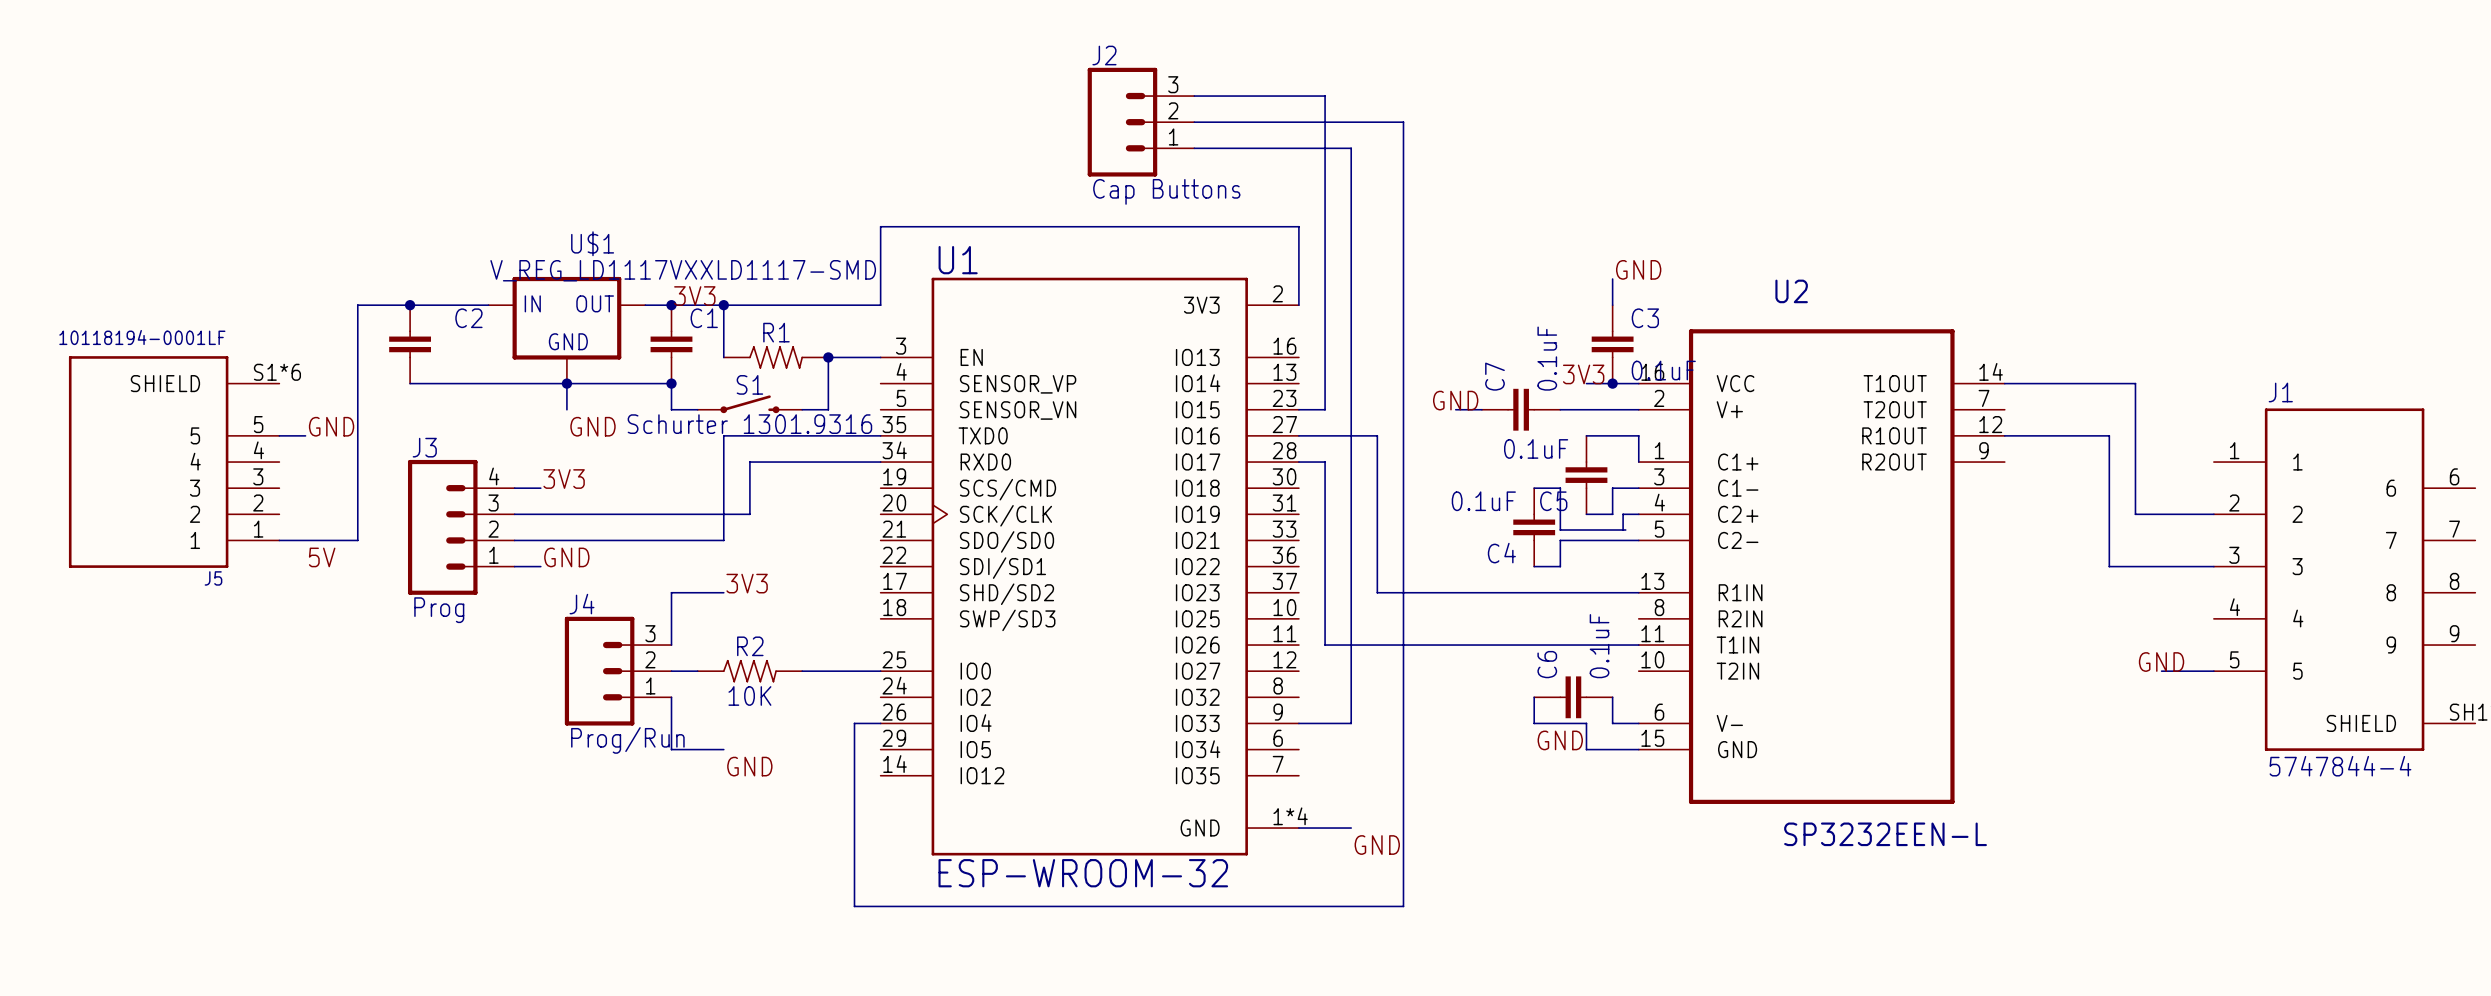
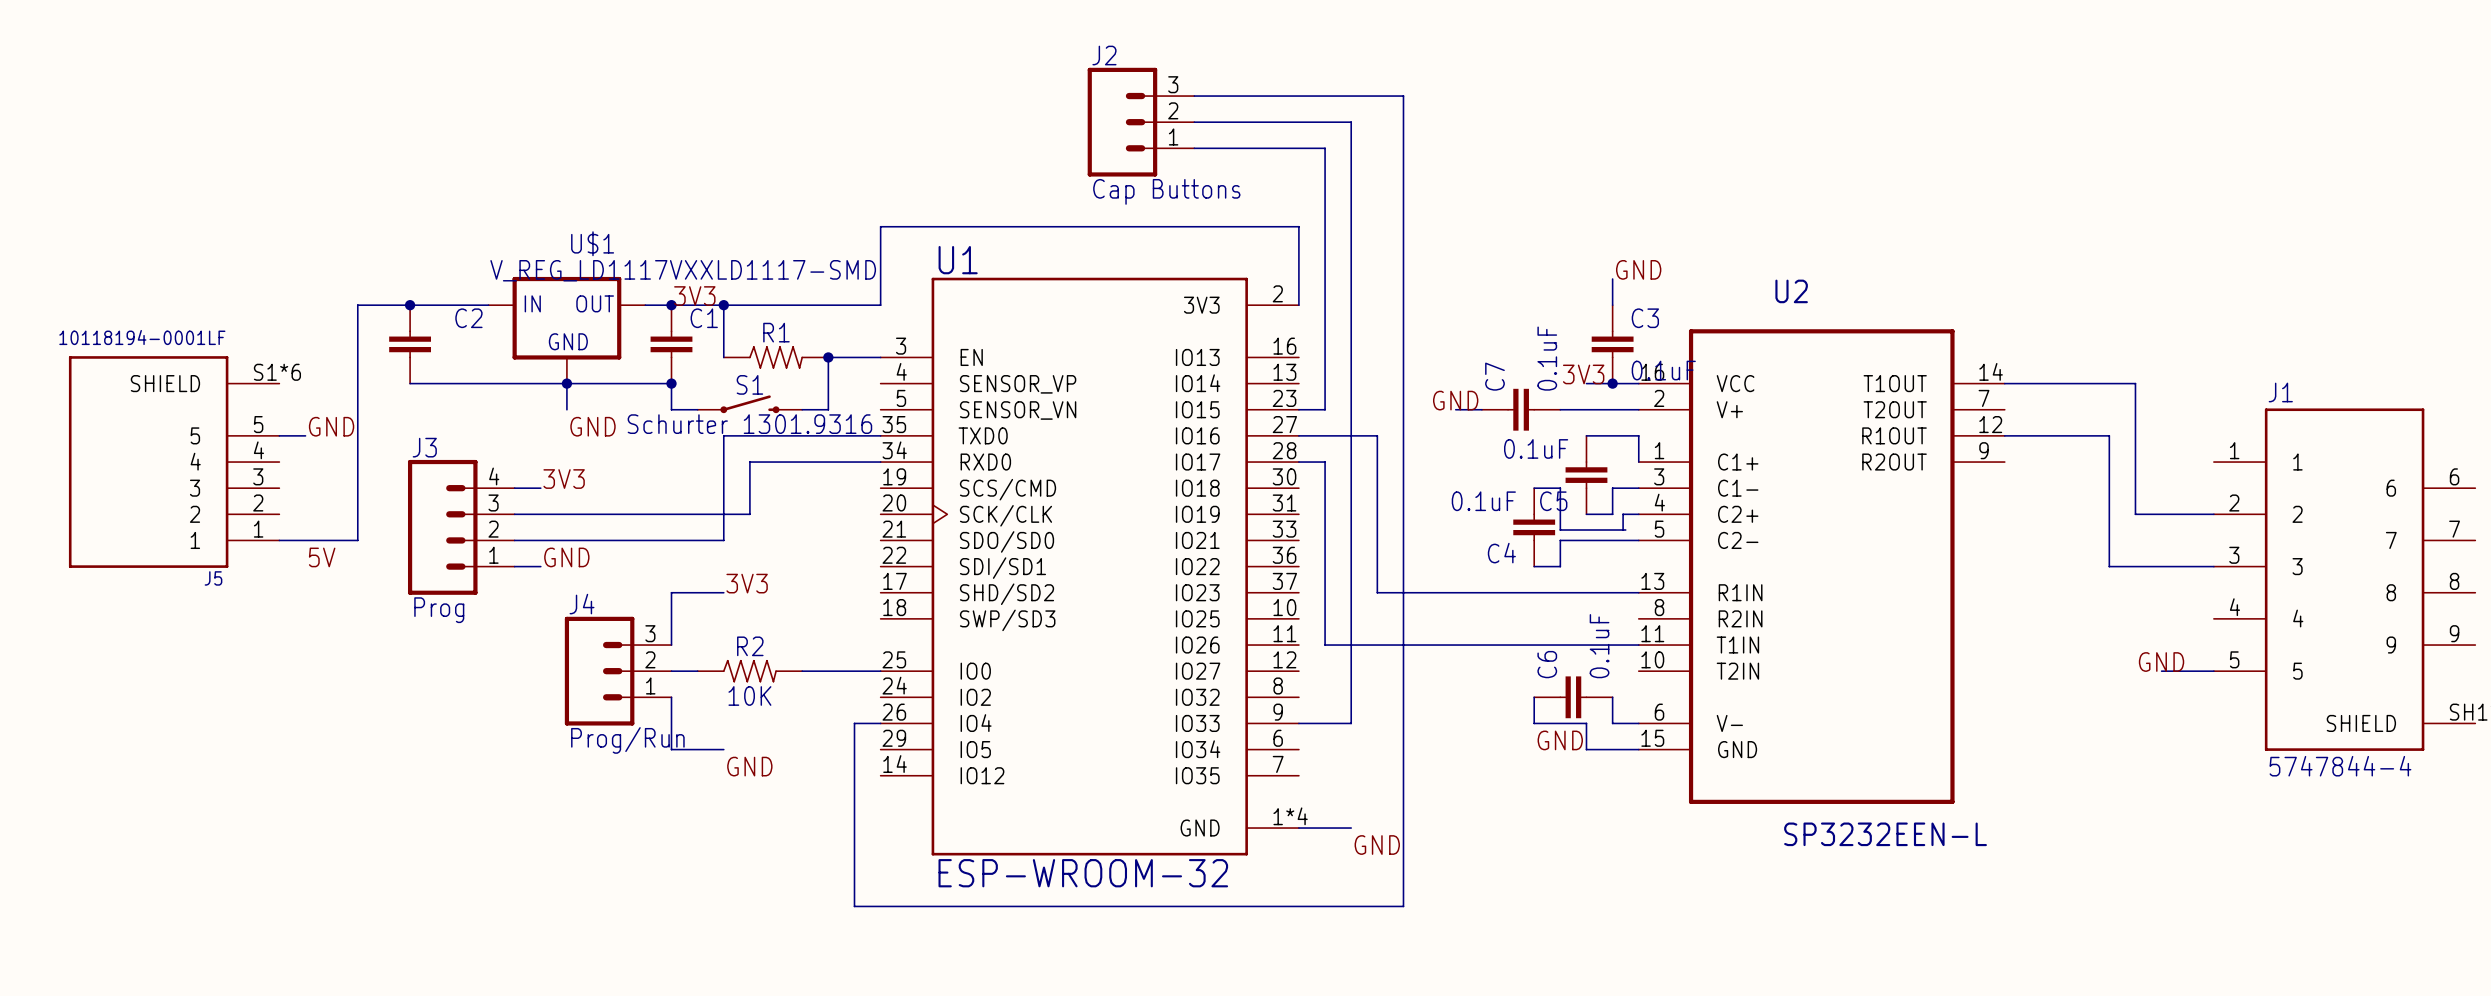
wire: (1325, 96) (1325, 148) (1351, 148) -> (1351, 122) (1351, 148)
wire: (1351, 122) (1403, 122) -> (1325, 96) (1403, 96) (1403, 122)

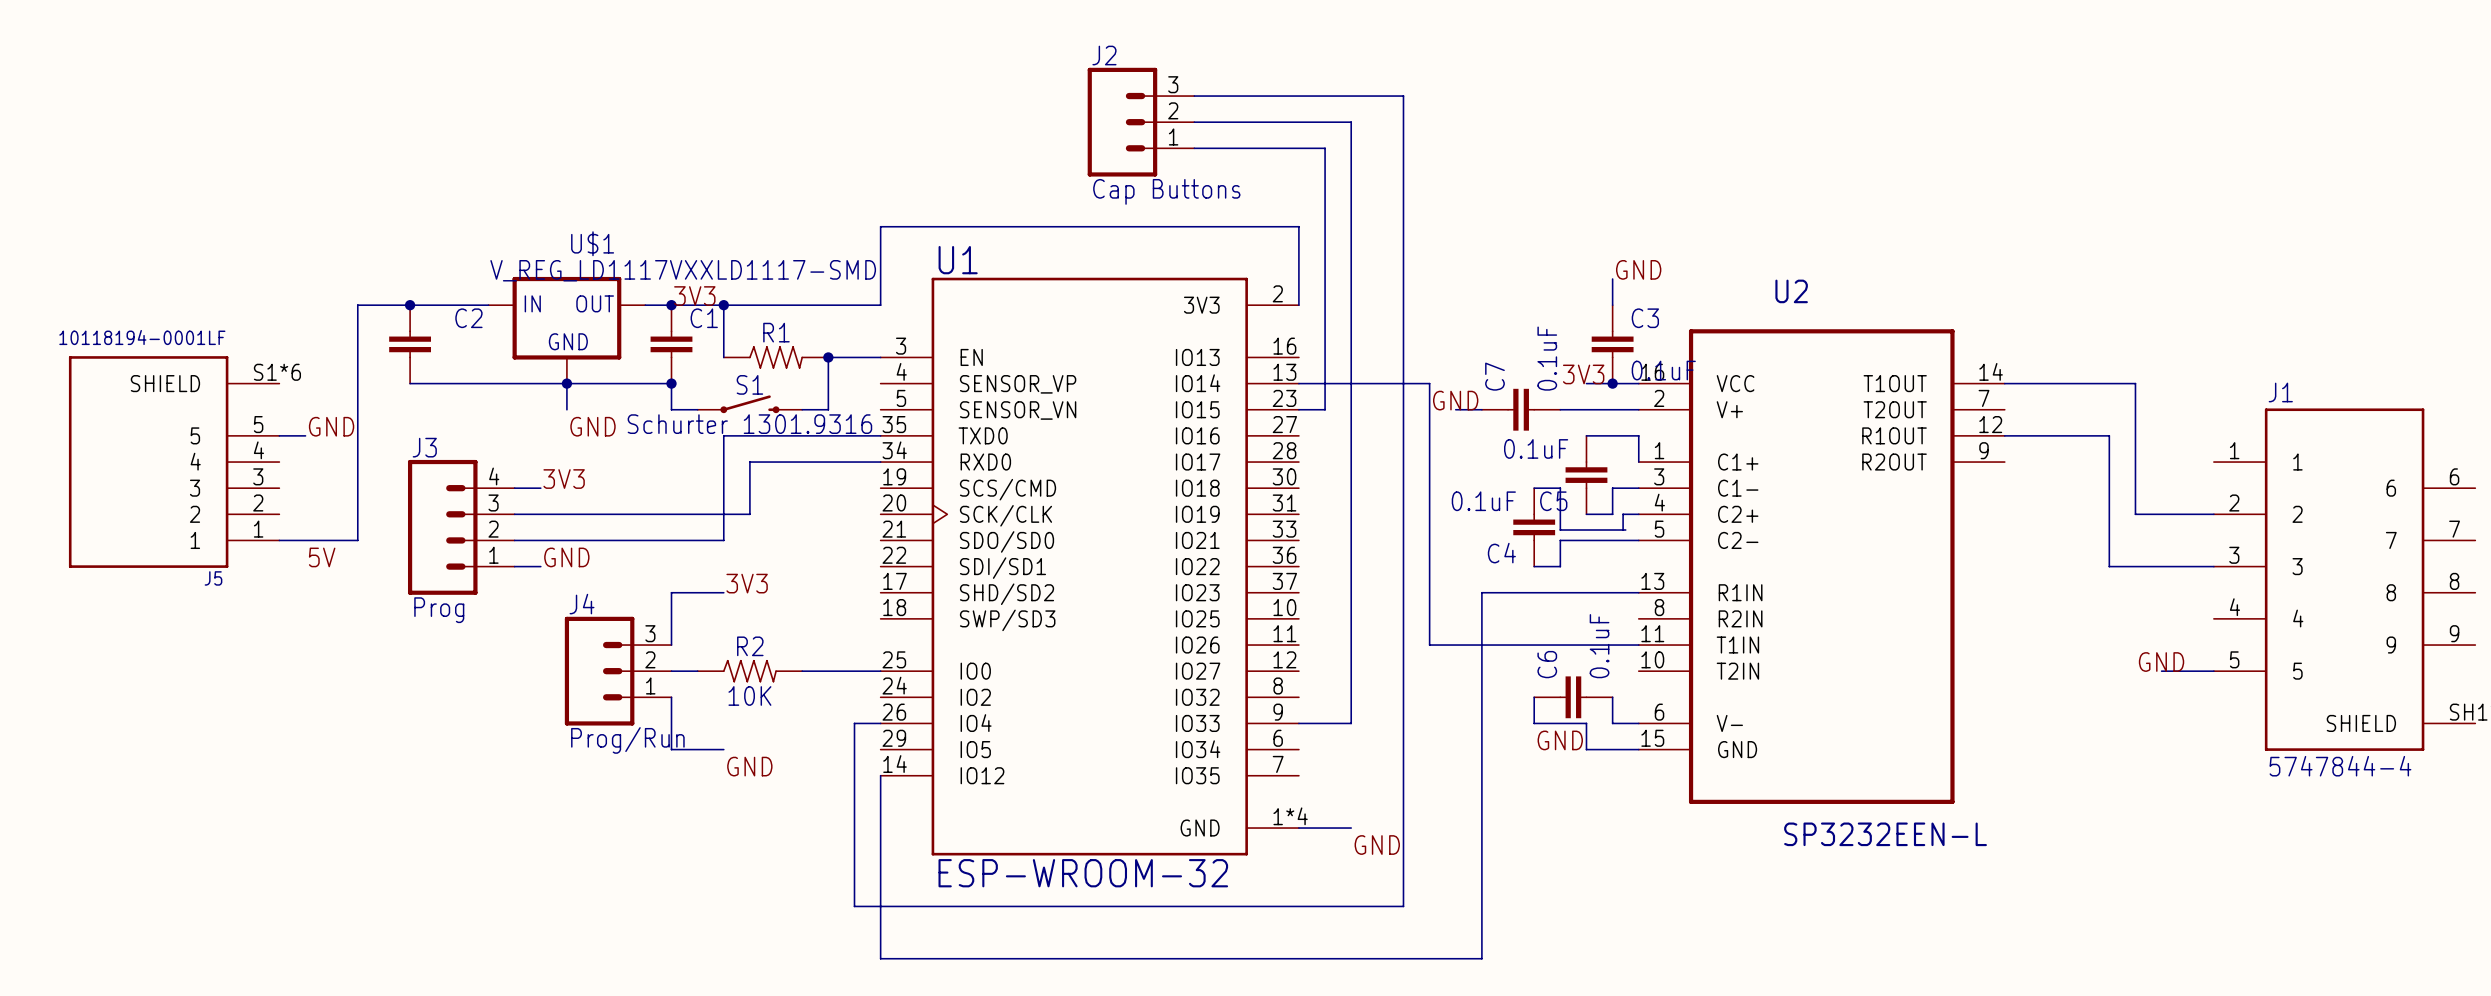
wire: (1298, 435) (1377, 435) (1377, 592) (1481, 592) -> (880, 775) (880, 958) (1481, 958) (1481, 592)
wire: (1298, 462) (1325, 462) (1325, 645) (1429, 645) -> (1298, 383) (1429, 383) (1429, 645)

